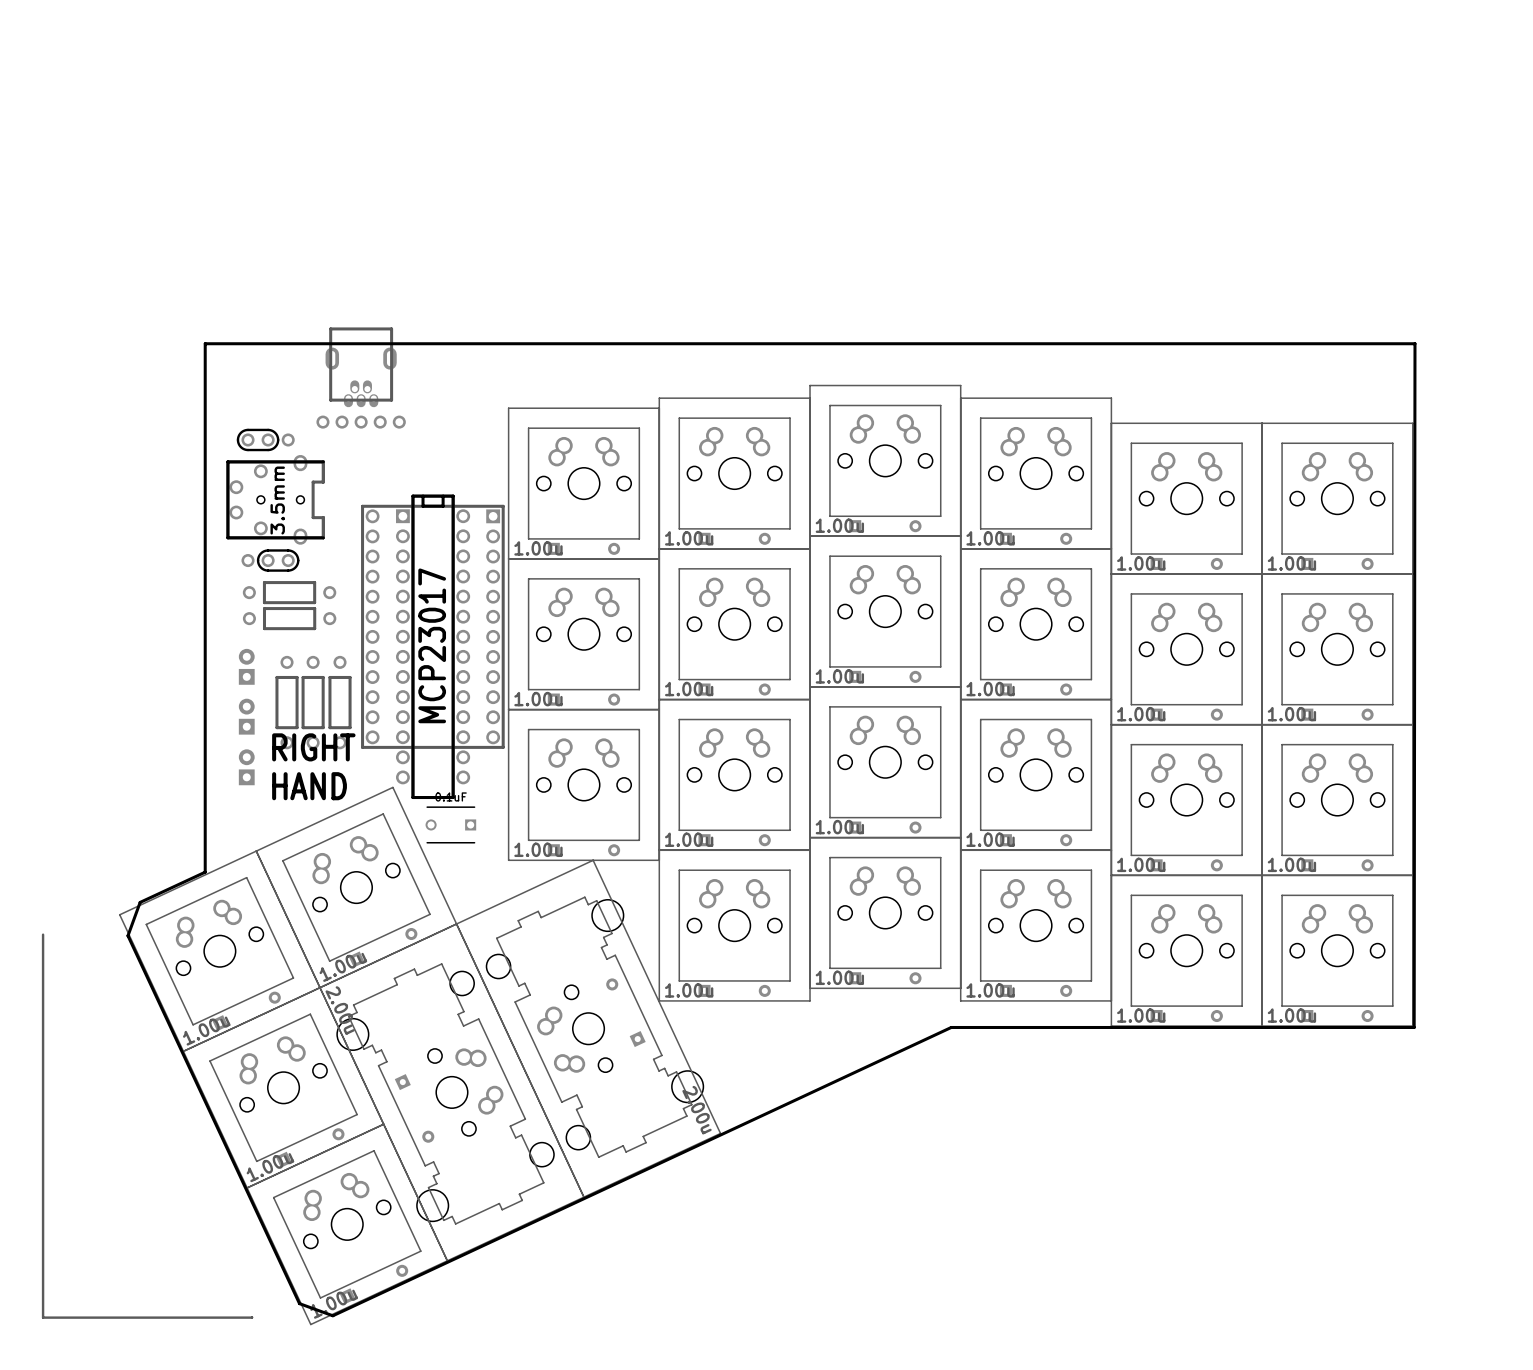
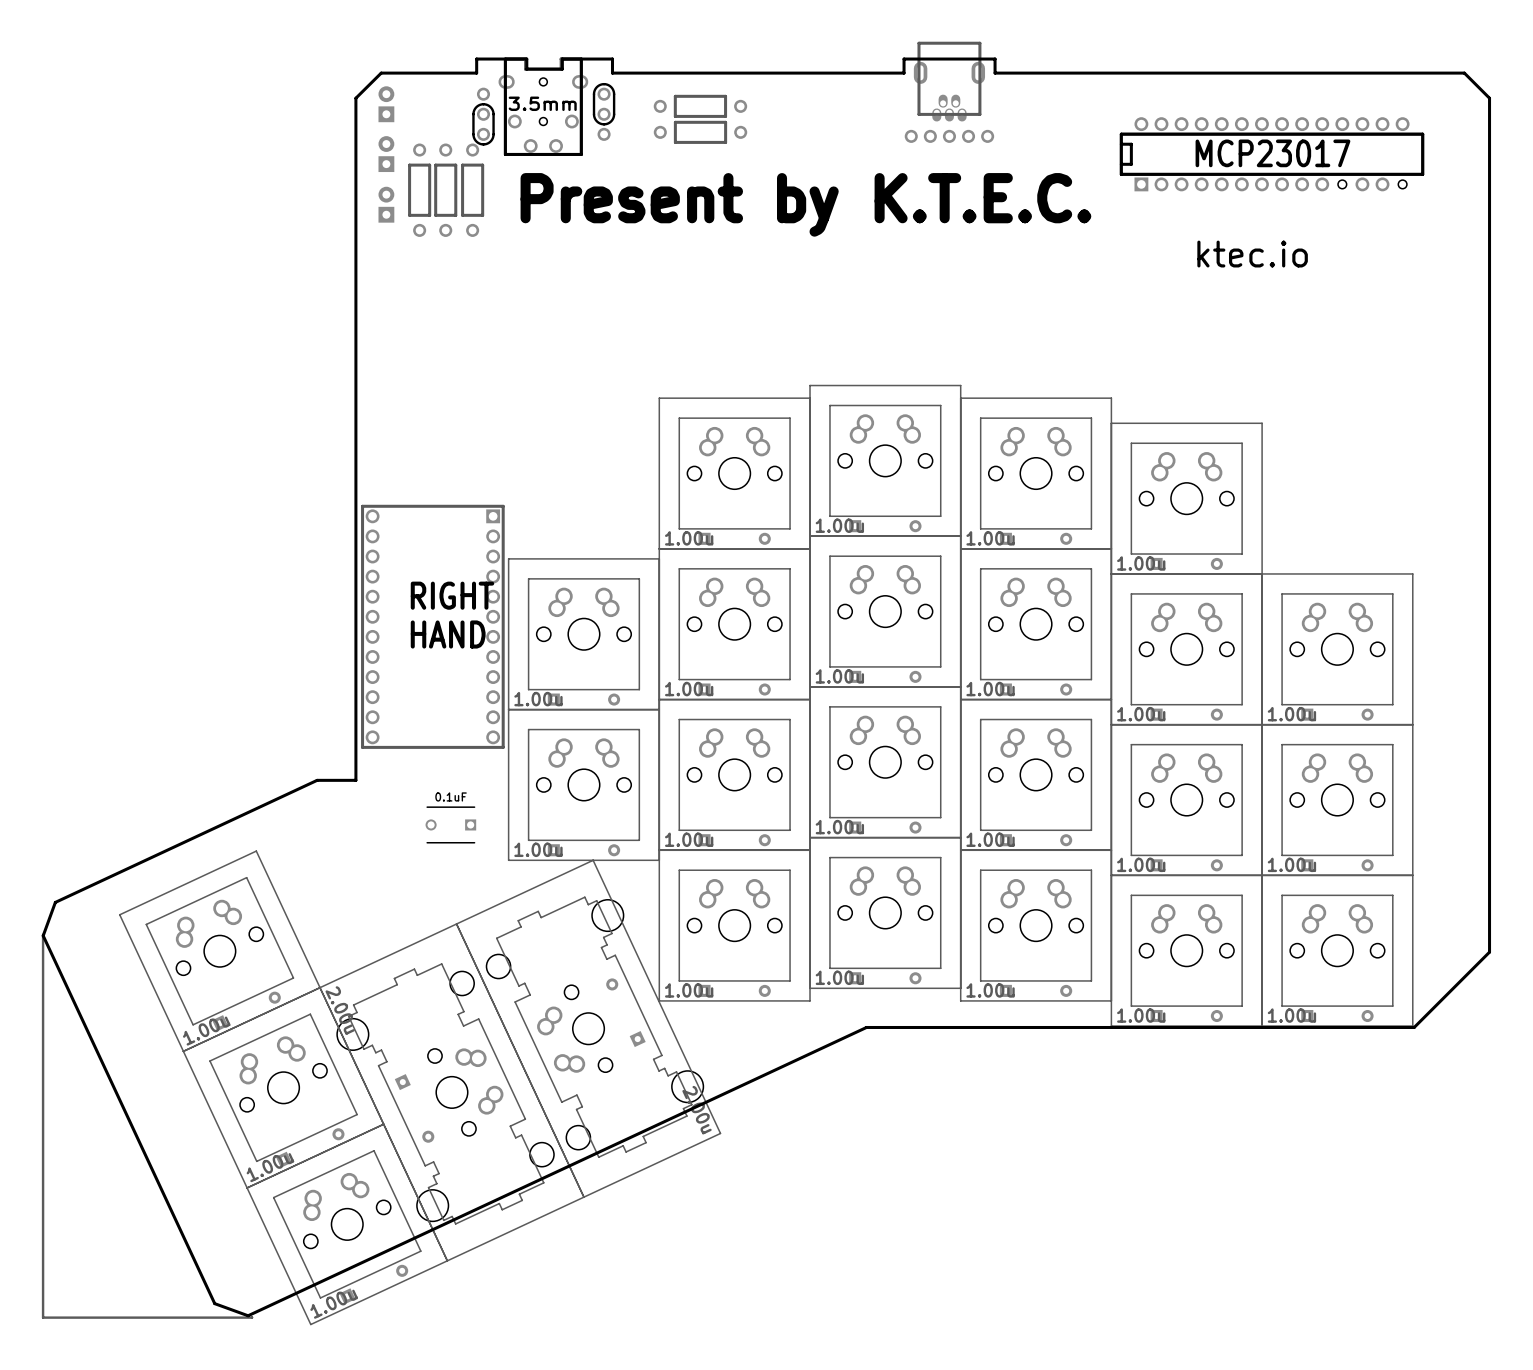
part: none -> (949, 92)
part: none -> (386, 104)
part: none -> 3.5mm (543, 106)
part: none -> (700, 106)
part: none -> (604, 111)
part: none -> (483, 116)
part: none -> (700, 132)
part: none -> (386, 154)
part: none -> MCP23017 (1272, 154)
part: none -> (419, 190)
part: none -> (445, 190)
part: none -> (472, 190)
part: none -> (386, 204)
text: none -> Present by K.T.E.C. (805, 204)
text: none -> ktec.io (1252, 254)
part: (361, 378) -> none
part: (265, 439) -> none
part: (583, 483) -> none
part: (1337, 498) -> none
part: 3.5mm (275, 499) -> none
part: (270, 560) -> none
part: (289, 592) -> none
text: none -> RIGHT (452, 595)
part: (289, 618) -> none
text: none -> HAND (448, 634)
part: MCP23017 (433, 646) -> none
part: (246, 666) -> none
part: (287, 702) -> none
part: (313, 702) -> none
part: (340, 702) -> none
part: (246, 716) -> none
text: RIGHT (313, 747) -> none
part: (246, 767) -> none
text: HAND (309, 786) -> none
part: (356, 887) -> none
board edge: (951, 1027) (332, 1315) (299, 1303) (127, 935) (140, 902) (205, 872) (205, 343) (1414, 343) (1414, 1027) -> (951, 1027) (866, 1027) (248, 1315) (214, 1303) (43, 935) (55, 902) (317, 780) (355, 780) (355, 98) (381, 73) (476, 73) (476, 59) (526, 59) (526, 69) (562, 69) (562, 59) (612, 59) (612, 73) (904, 73) (904, 59) (995, 59) (995, 73) (1464, 73) (1489, 98) (1489, 952) (1414, 1027)

